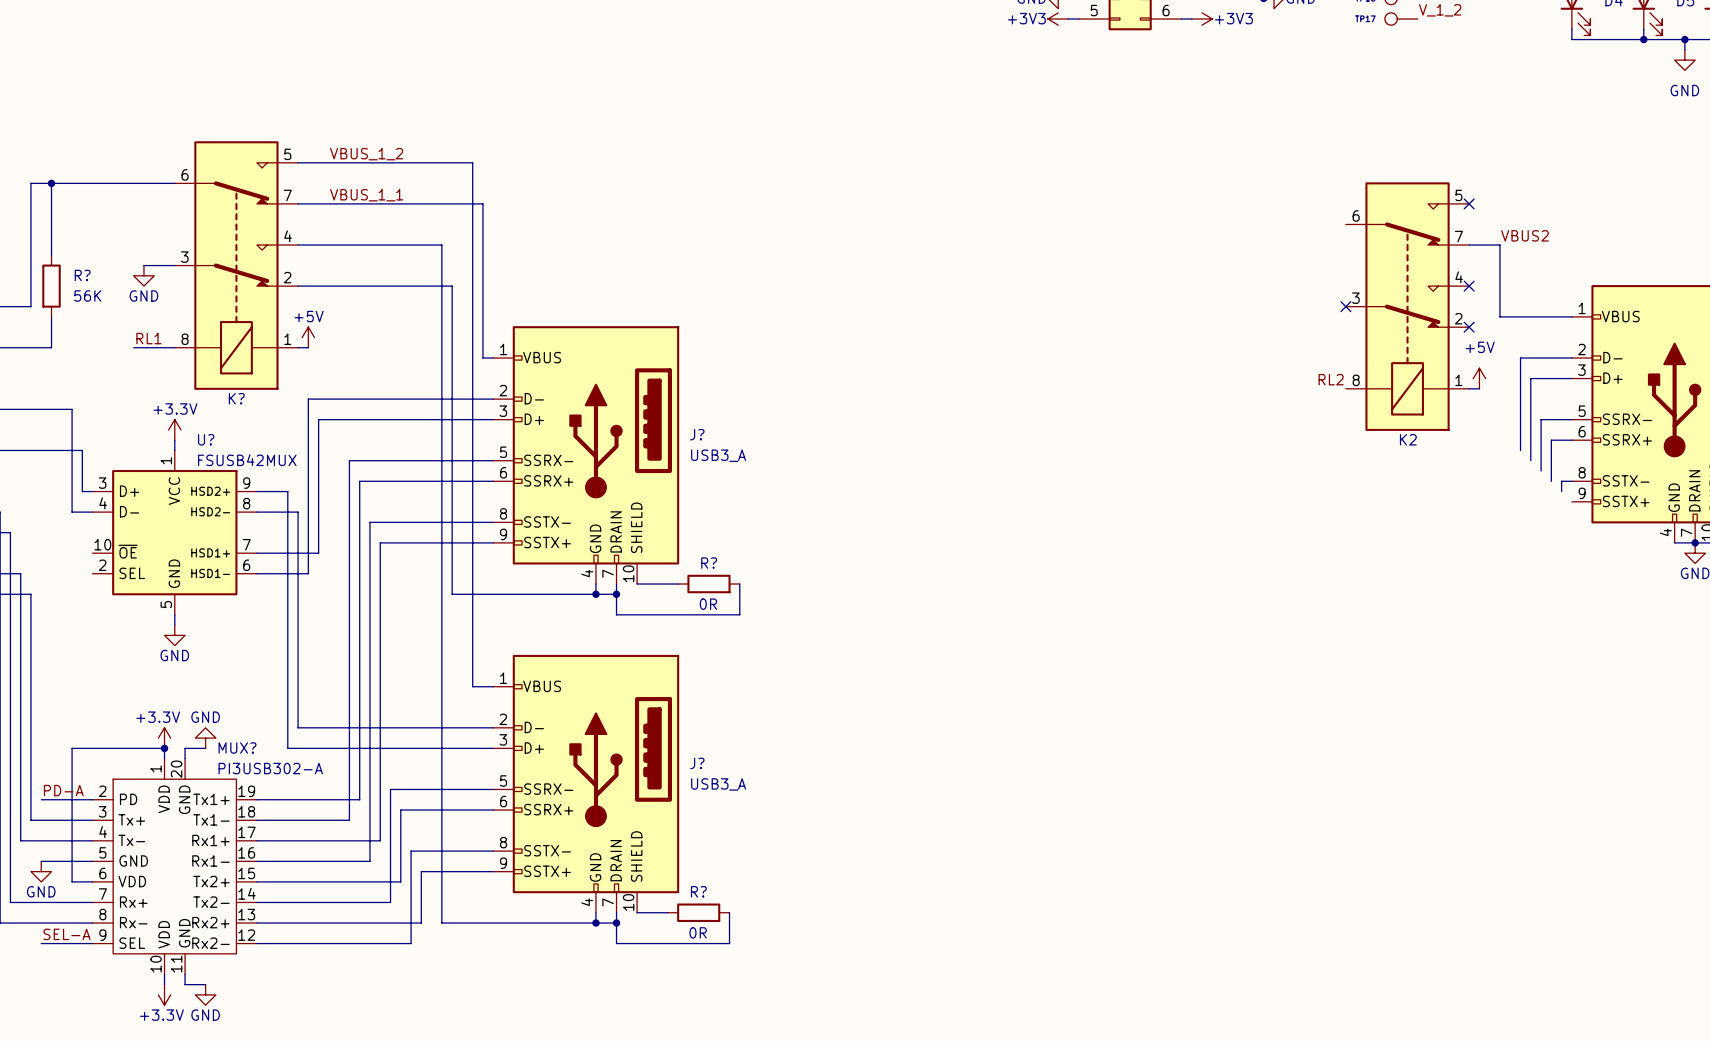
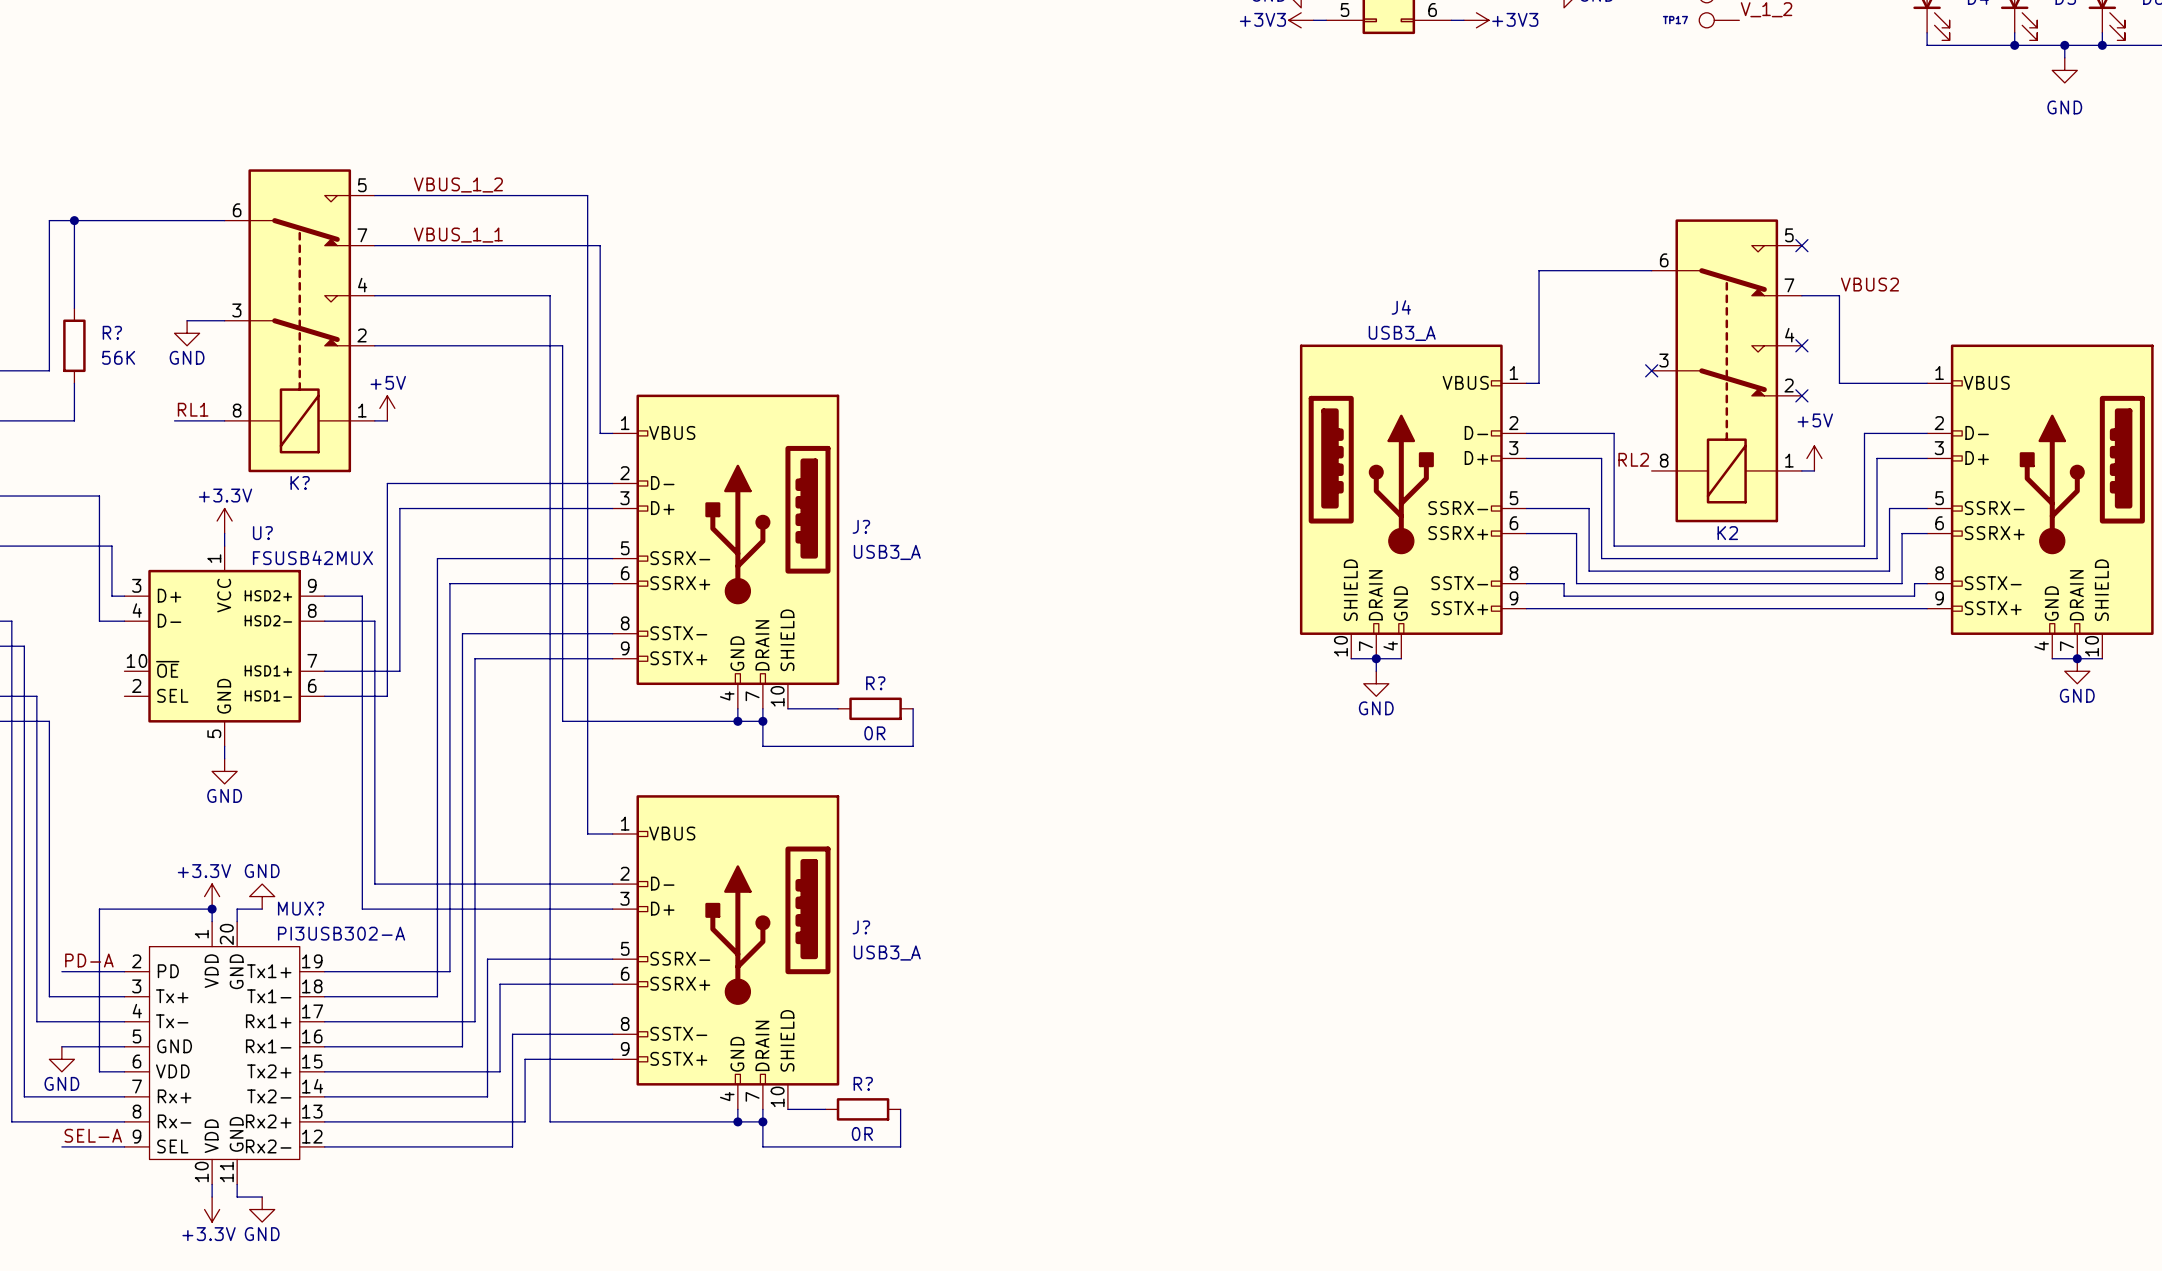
wire: none -> (1651, 270) (1539, 270) (1539, 383) (1526, 383)
wire: none -> (1526, 433) (1614, 433) (1614, 546) (1864, 546)
wire: none -> (1526, 458) (1601, 458) (1601, 558) (1877, 558)
J4: none -> USB3_A (1413, 501)
wire: none -> (1526, 508) (1589, 508) (1589, 571) (1889, 571)
wire: none -> (1526, 533) (1576, 533) (1576, 583) (1902, 583)
wire: none -> (1526, 583) (1564, 583) (1564, 596) (1914, 596)
wire: none -> (1526, 608) (1927, 608)
wire: none -> (1351, 658) (1401, 658)
wire: none -> (1376, 658) (1376, 671)
junction: none -> (1376, 658)
power symbol: none -> GND (1376, 683)

